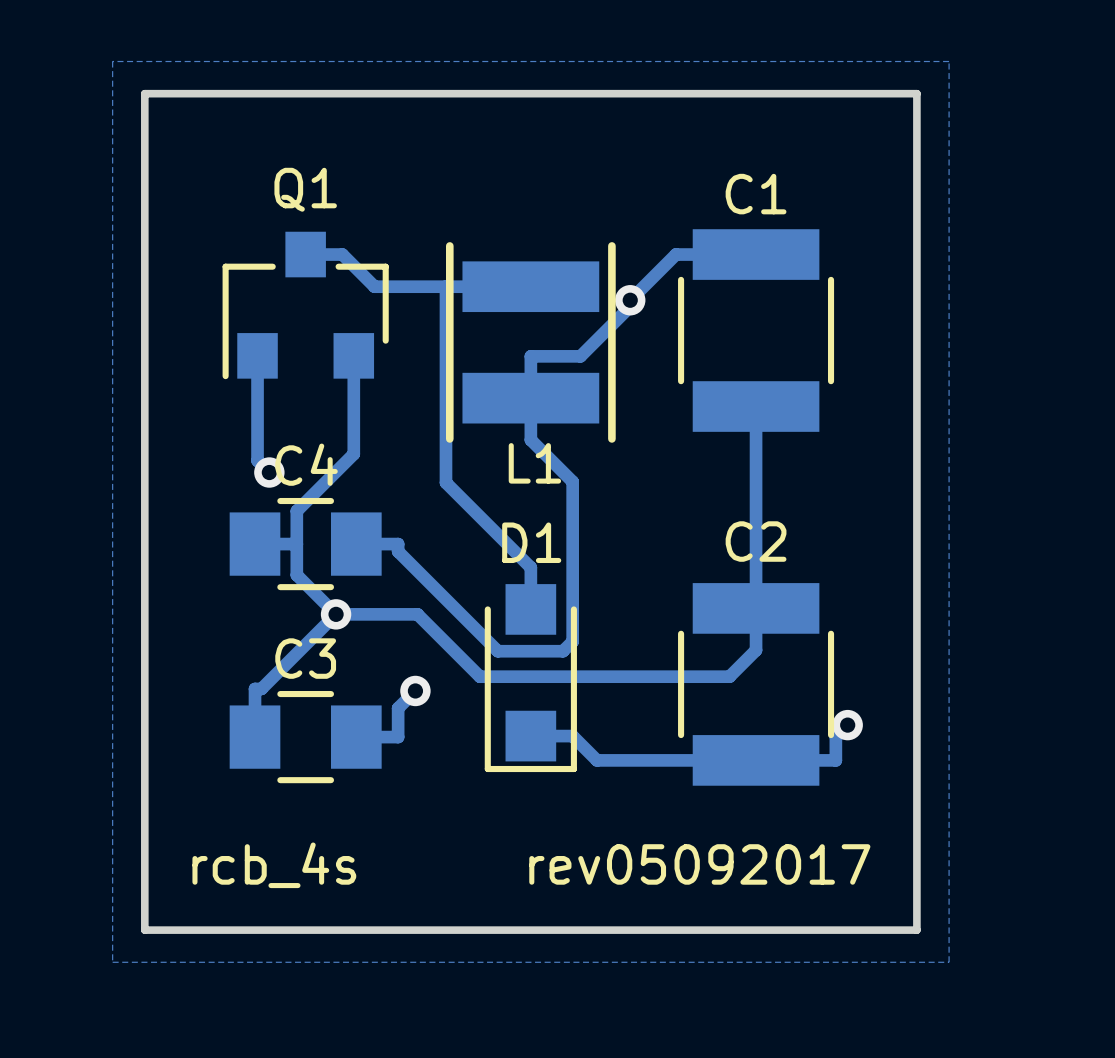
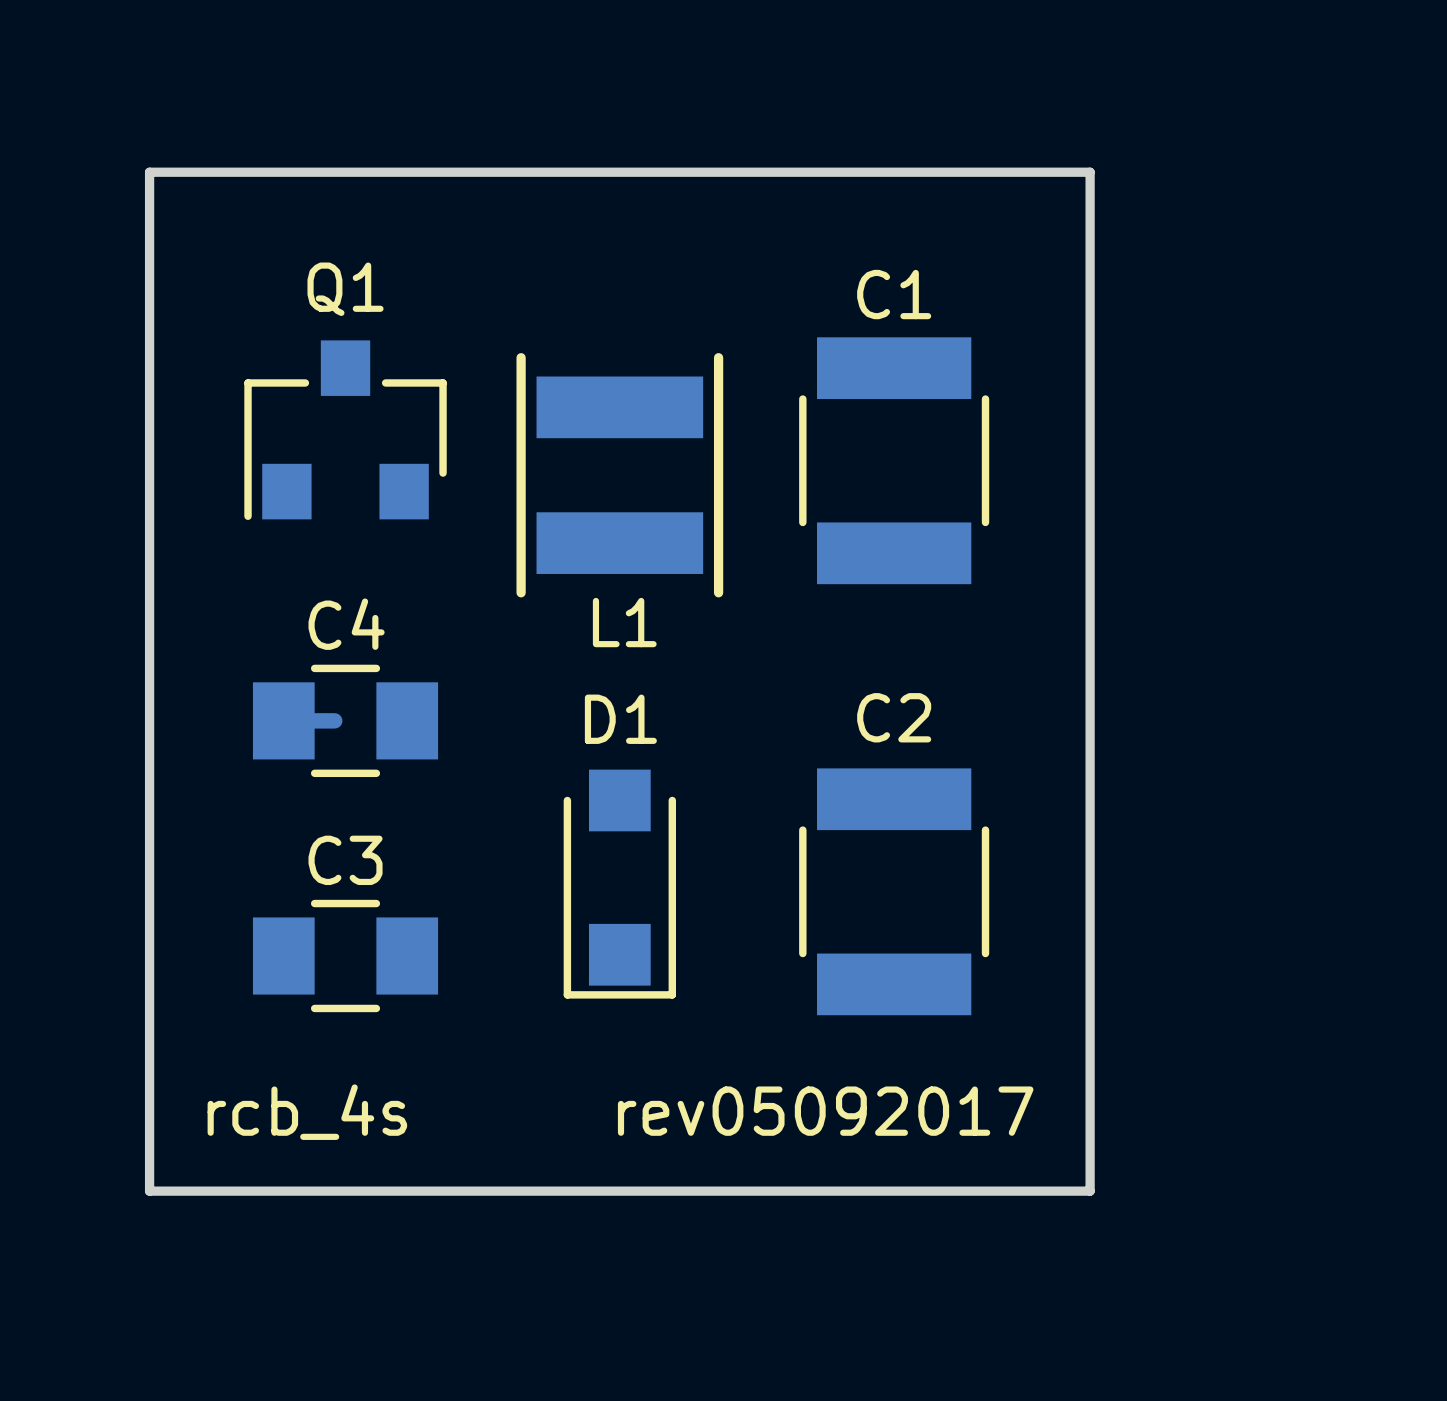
zone outline: (949, 61) (112, 61) (112, 962) (949, 962) (949, 61) -> none
track: (305, 254) (342, 254) (374, 286) (530, 286) -> none
track: (756, 254) (675, 254) (630, 300) (630, 306) (580, 356) (530, 356) (530, 439) (572, 481) (572, 641) (563, 651) (497, 651) (398, 551) (398, 544) (356, 544) -> none
track: (445, 286) (445, 482) (530, 567) (530, 609) -> none
via: (630, 300) -> none
track: (257, 355) (257, 460) (269, 472) -> none
track: (353, 355) (353, 454) (296, 511) (296, 575) (336, 614) -> none
track: (756, 406) (756, 650) (729, 676) (479, 676) (417, 614) (336, 614) -> none
via: (269, 472) -> none
track: (336, 614) (261, 688) (255, 688) (255, 737) -> none
via: (336, 614) -> none
track: (415, 690) (398, 708) (398, 737) (356, 737) -> none
via: (415, 690) -> none
track: (847, 725) (835, 736) (835, 760) (596, 760) (572, 736) (530, 736) -> none
via: (847, 725) -> none

